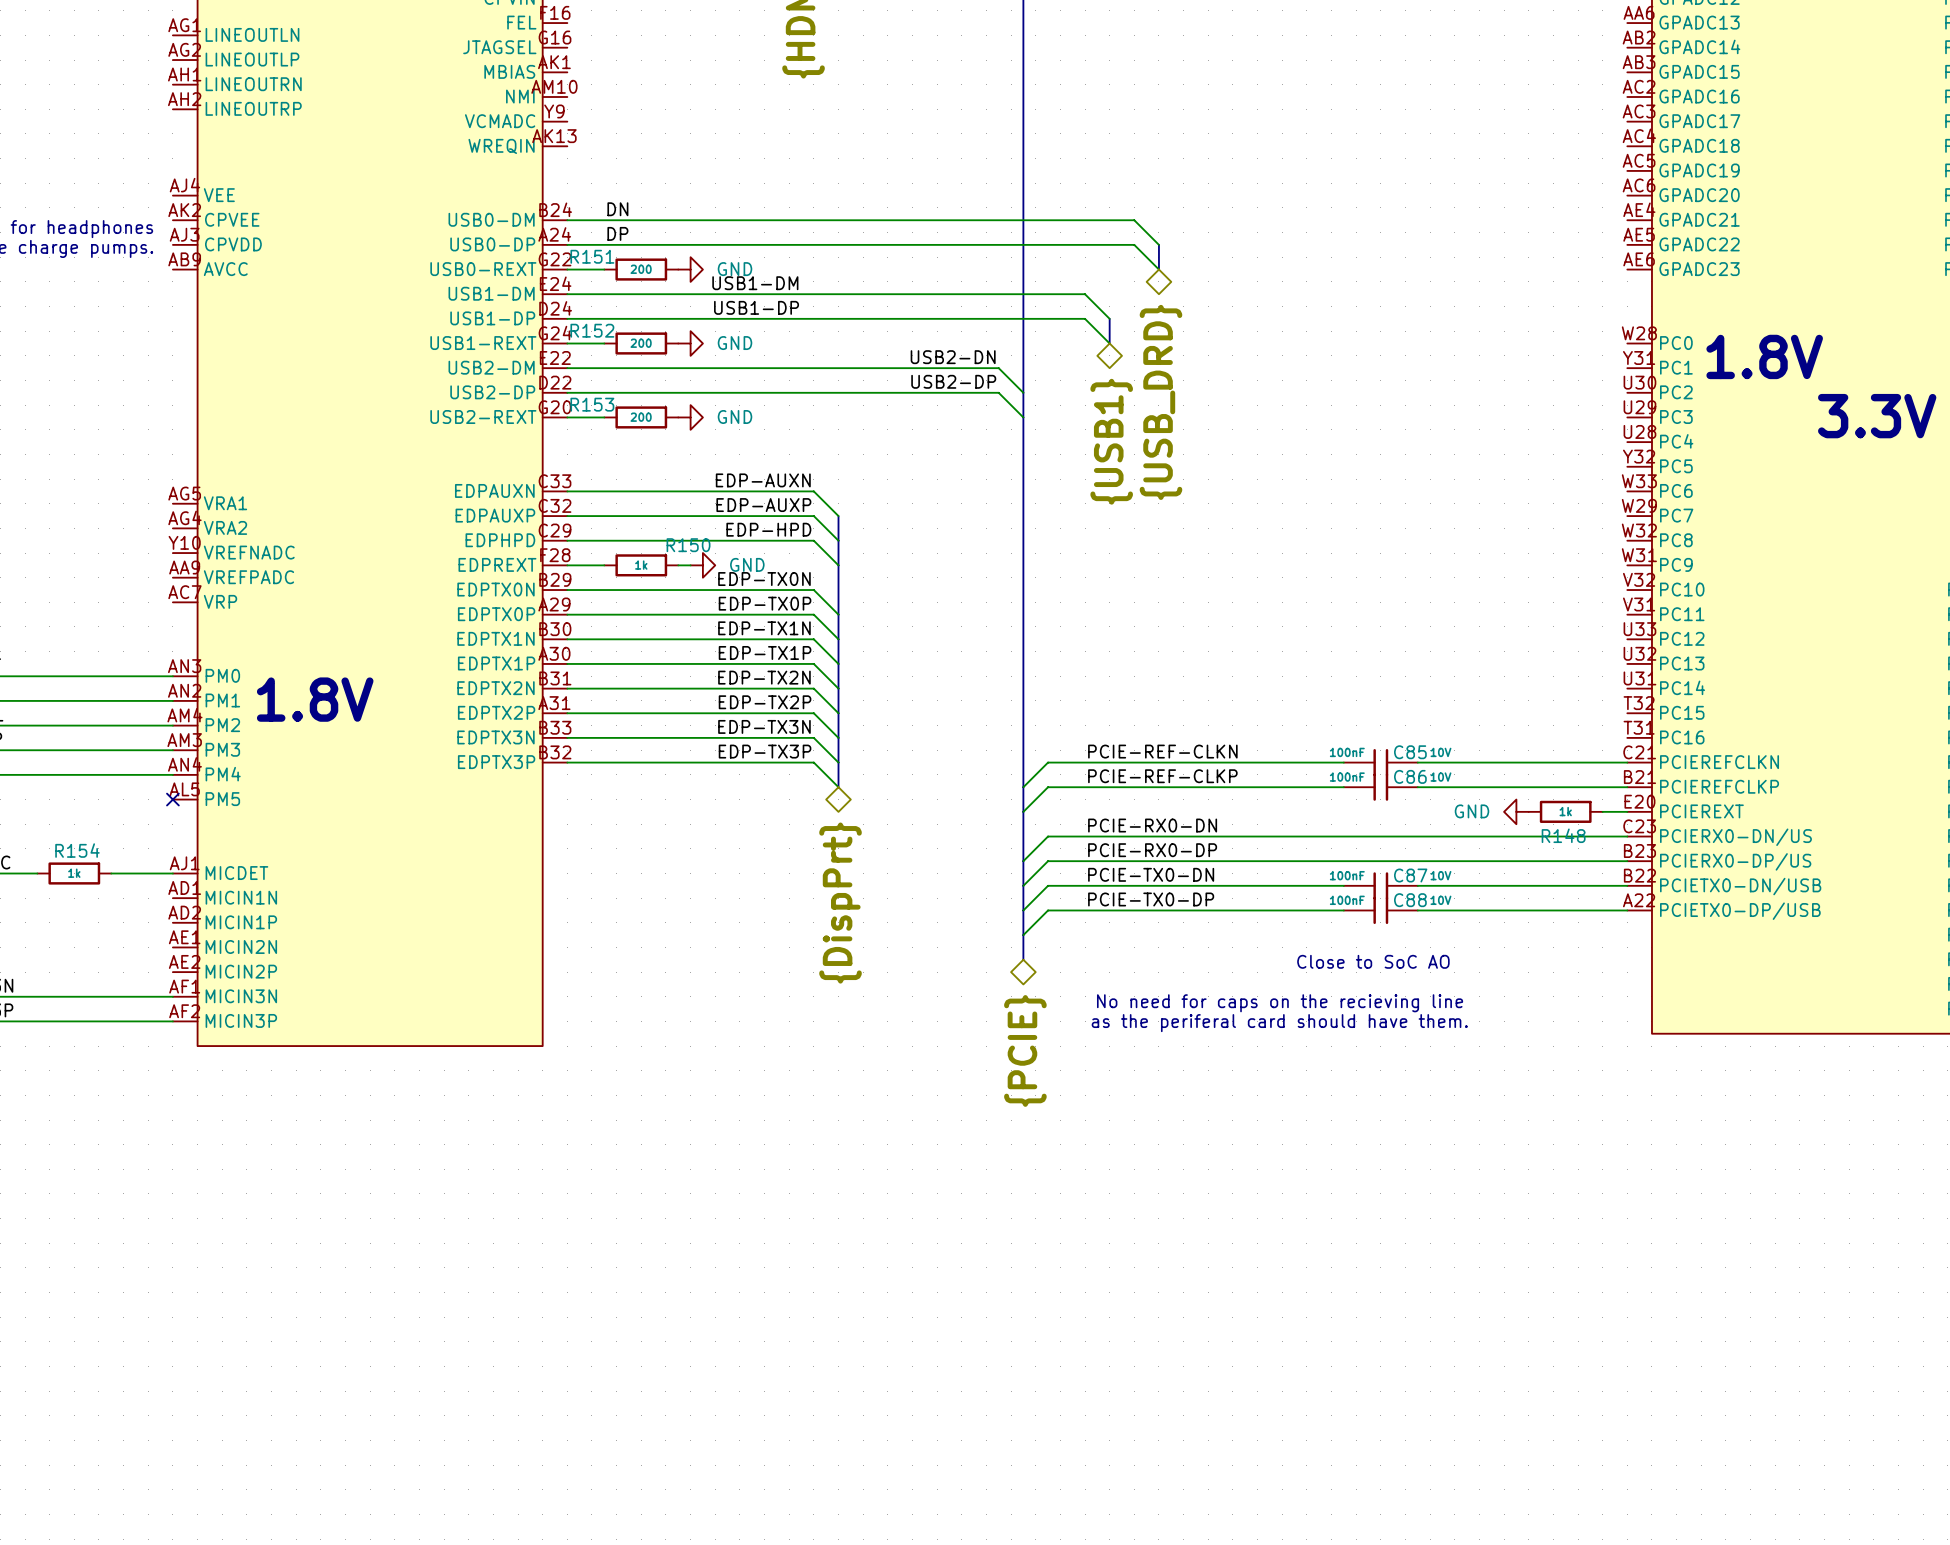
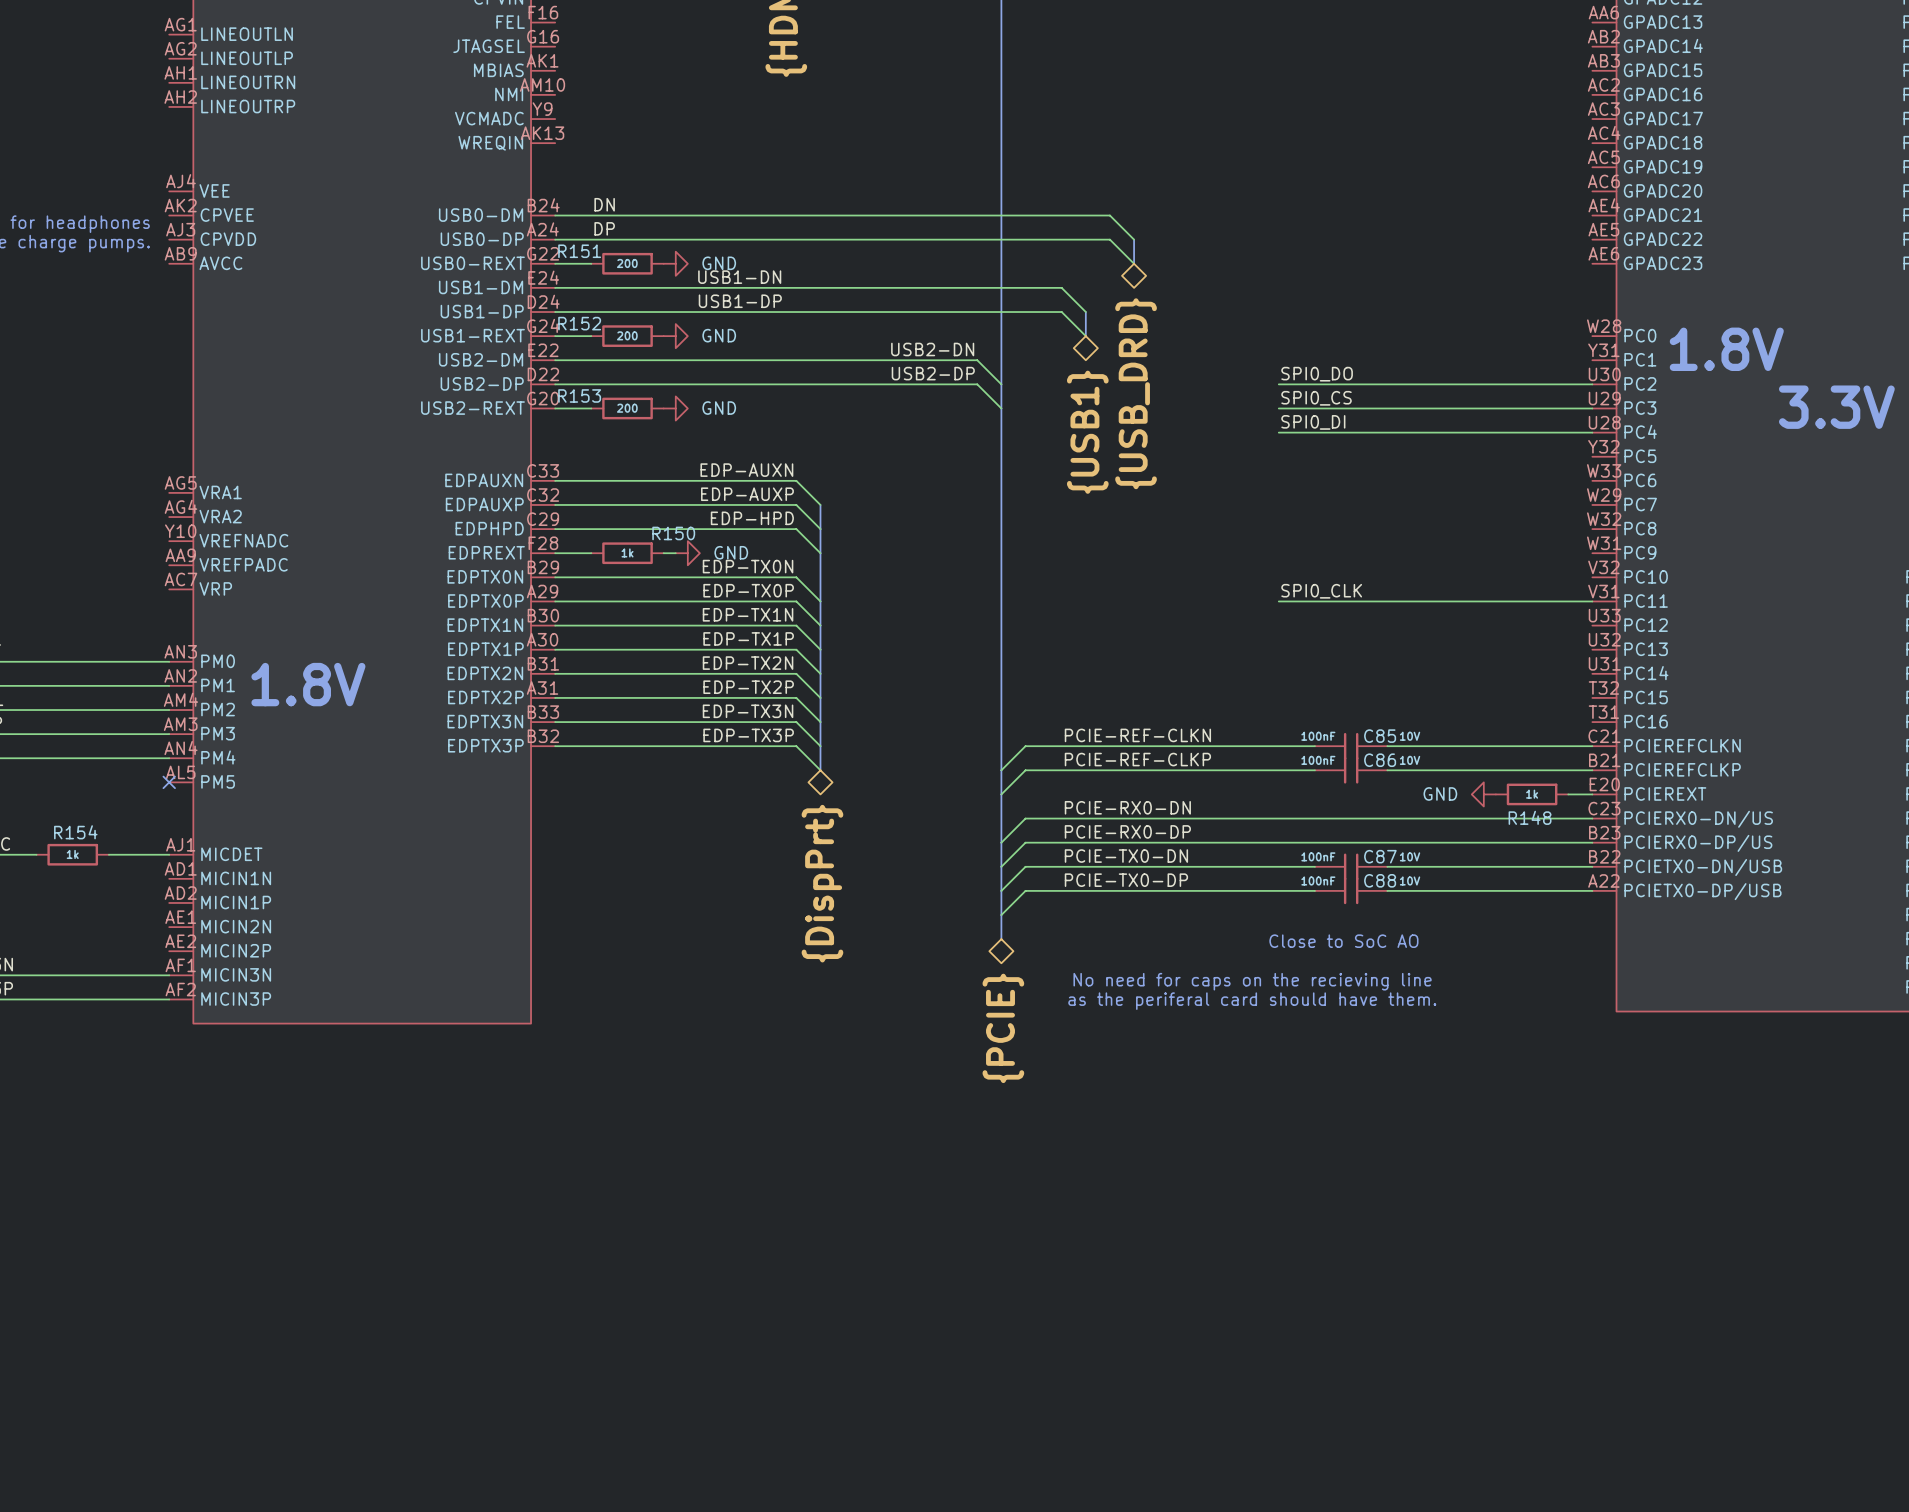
label: USB1-DM (755, 283) -> USB1-DN (739, 277)
label: none -> SPI0_DO (1317, 374)
wire: none -> (1278, 384) (1592, 384)
label: none -> SPI0_CS (1316, 398)
wire: none -> (1278, 408) (1592, 408)
label: none -> SPI0_DI (1313, 422)
wire: none -> (1278, 432) (1592, 432)
label: none -> SPI0_CLK (1321, 591)
wire: none -> (1278, 601) (1592, 601)

